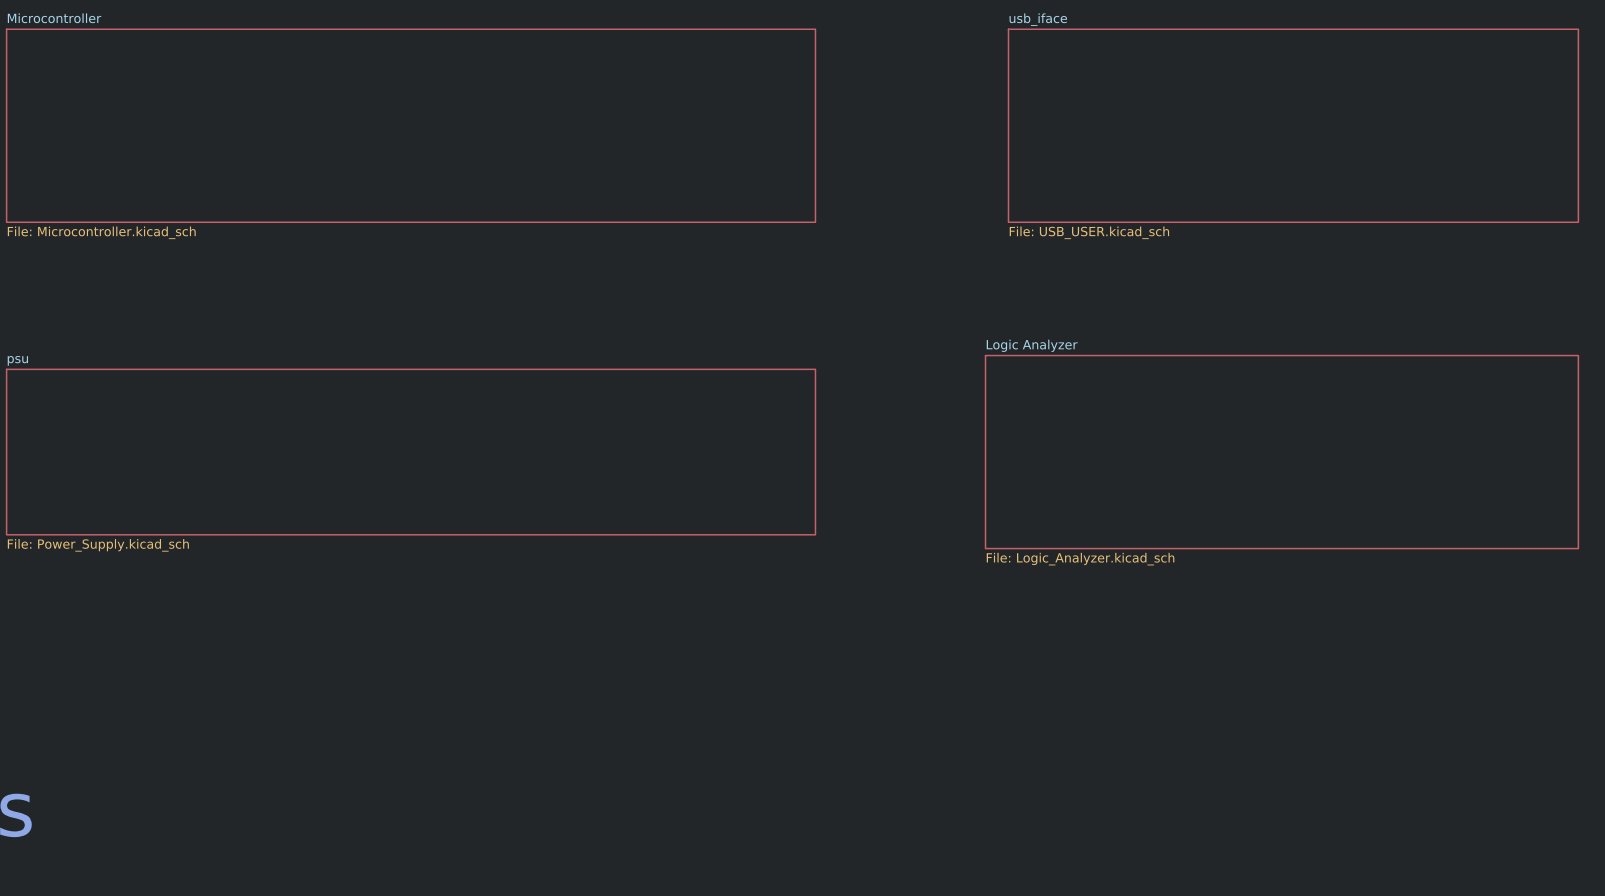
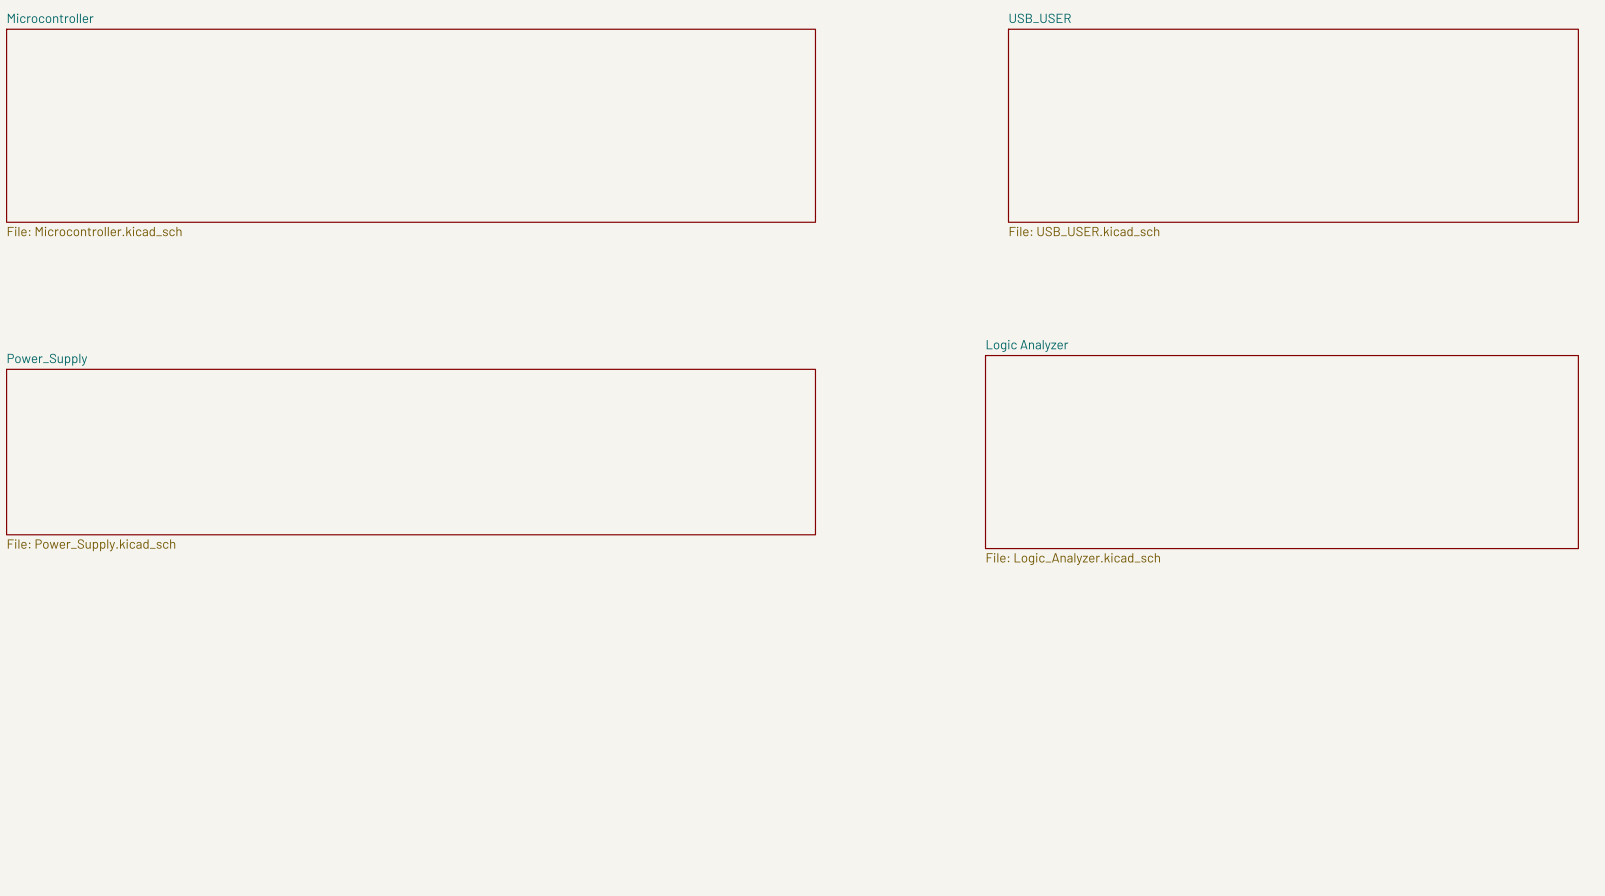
sheet usb_iface name: usb_iface (1038, 19) -> USB_USER (1040, 18)
sheet psu name: psu (17, 360) -> Power_Supply (47, 359)

